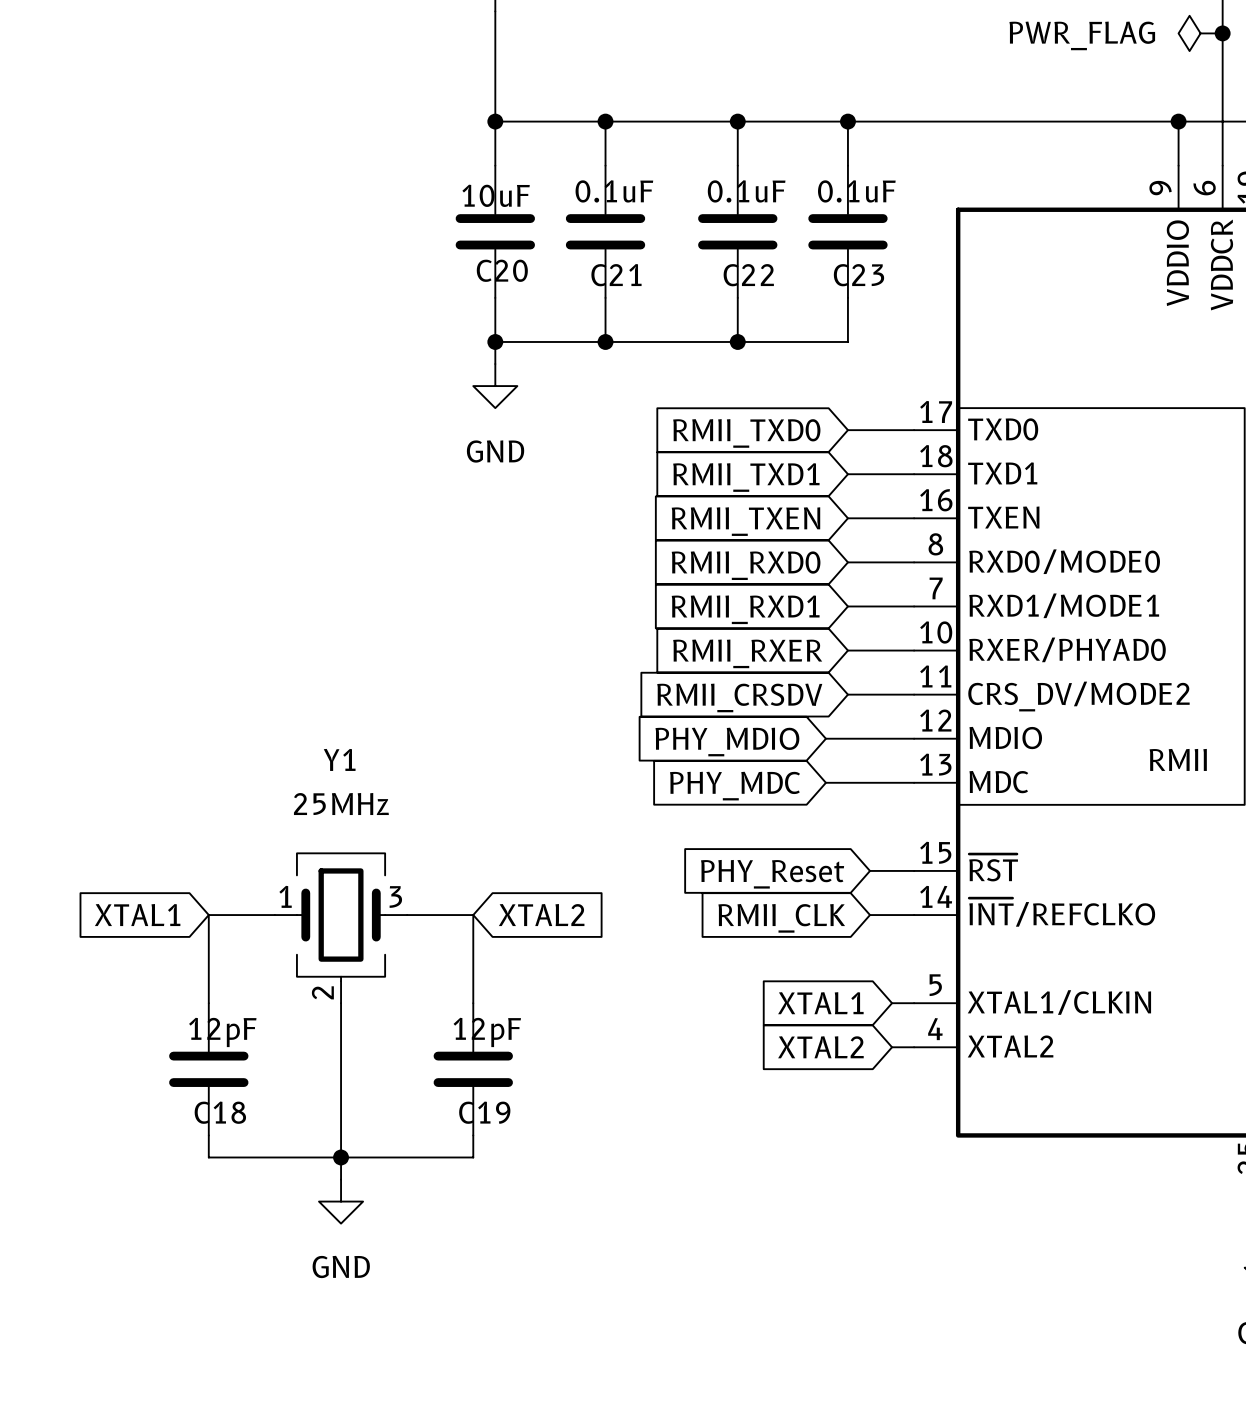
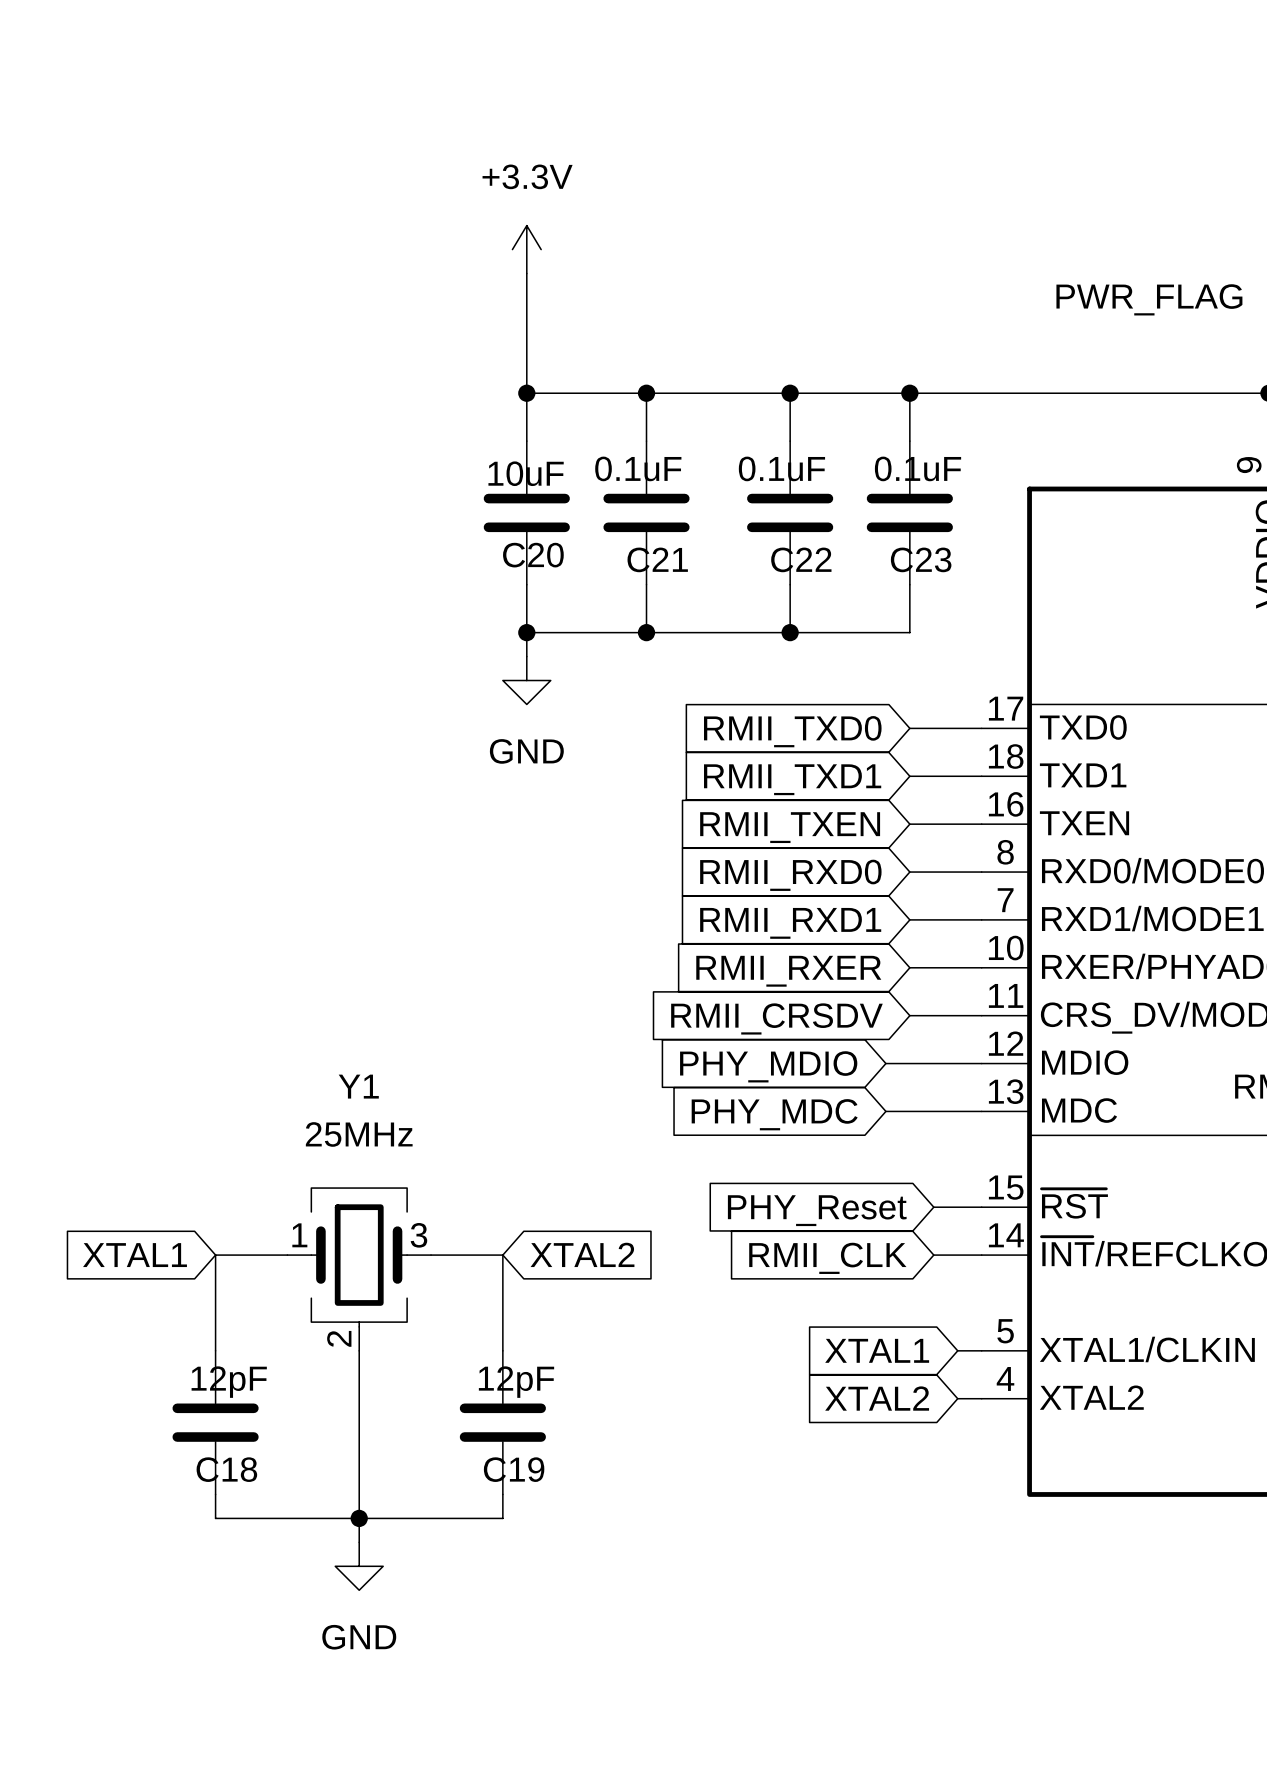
C21 value position: 0.1uF (614, 191) -> 0.1uF (638, 468)
C22 value position: 0.1uF (746, 191) -> 0.1uF (781, 468)

